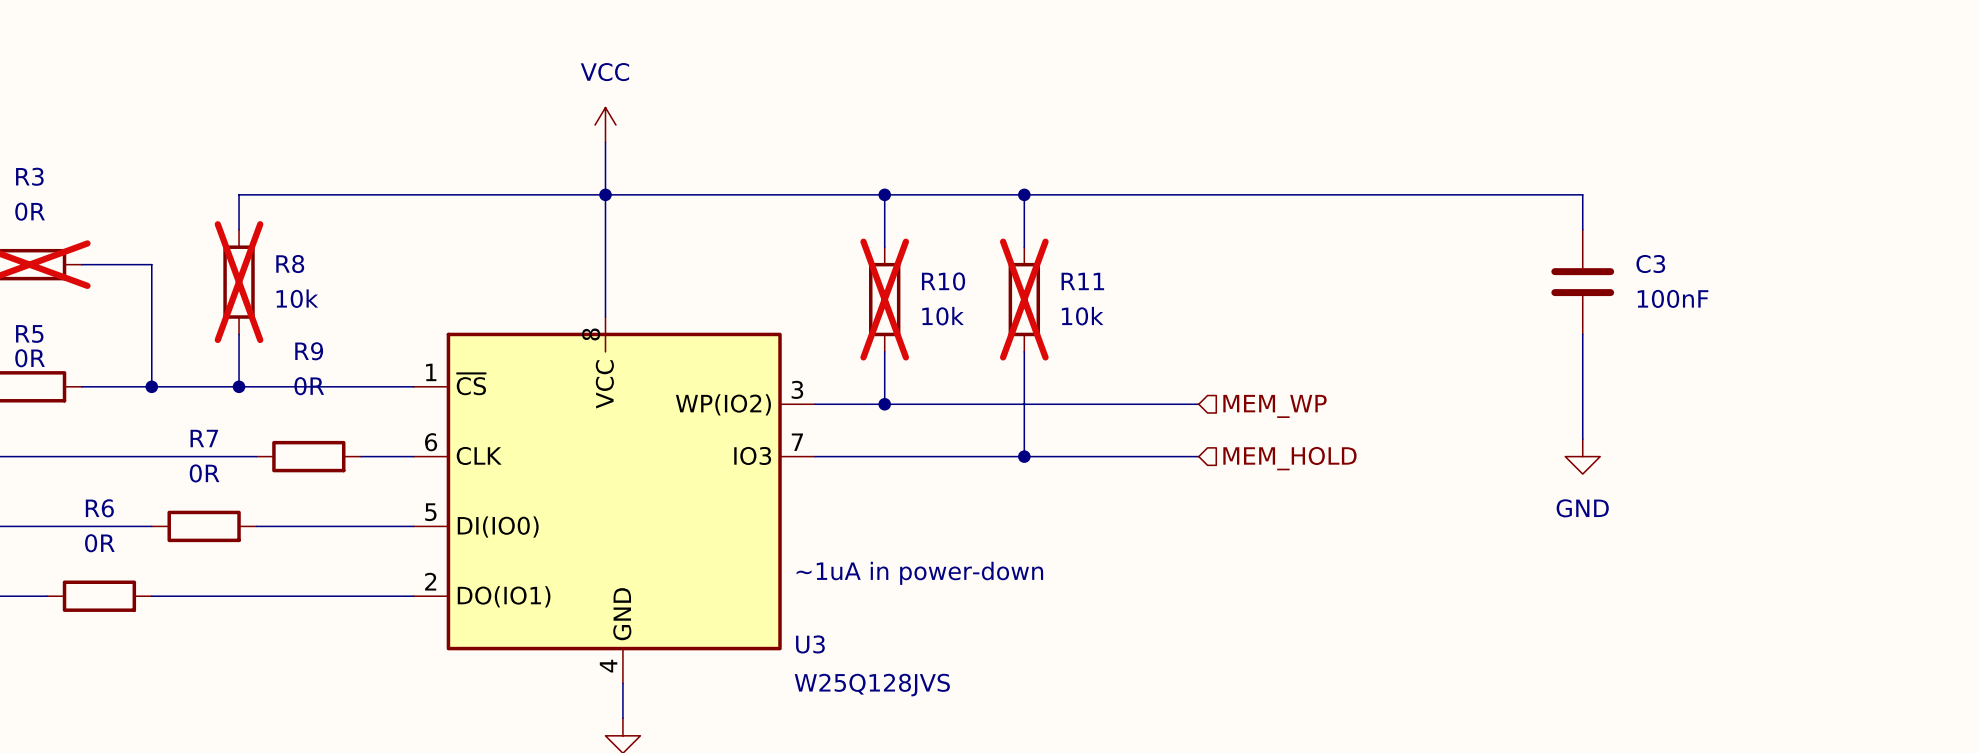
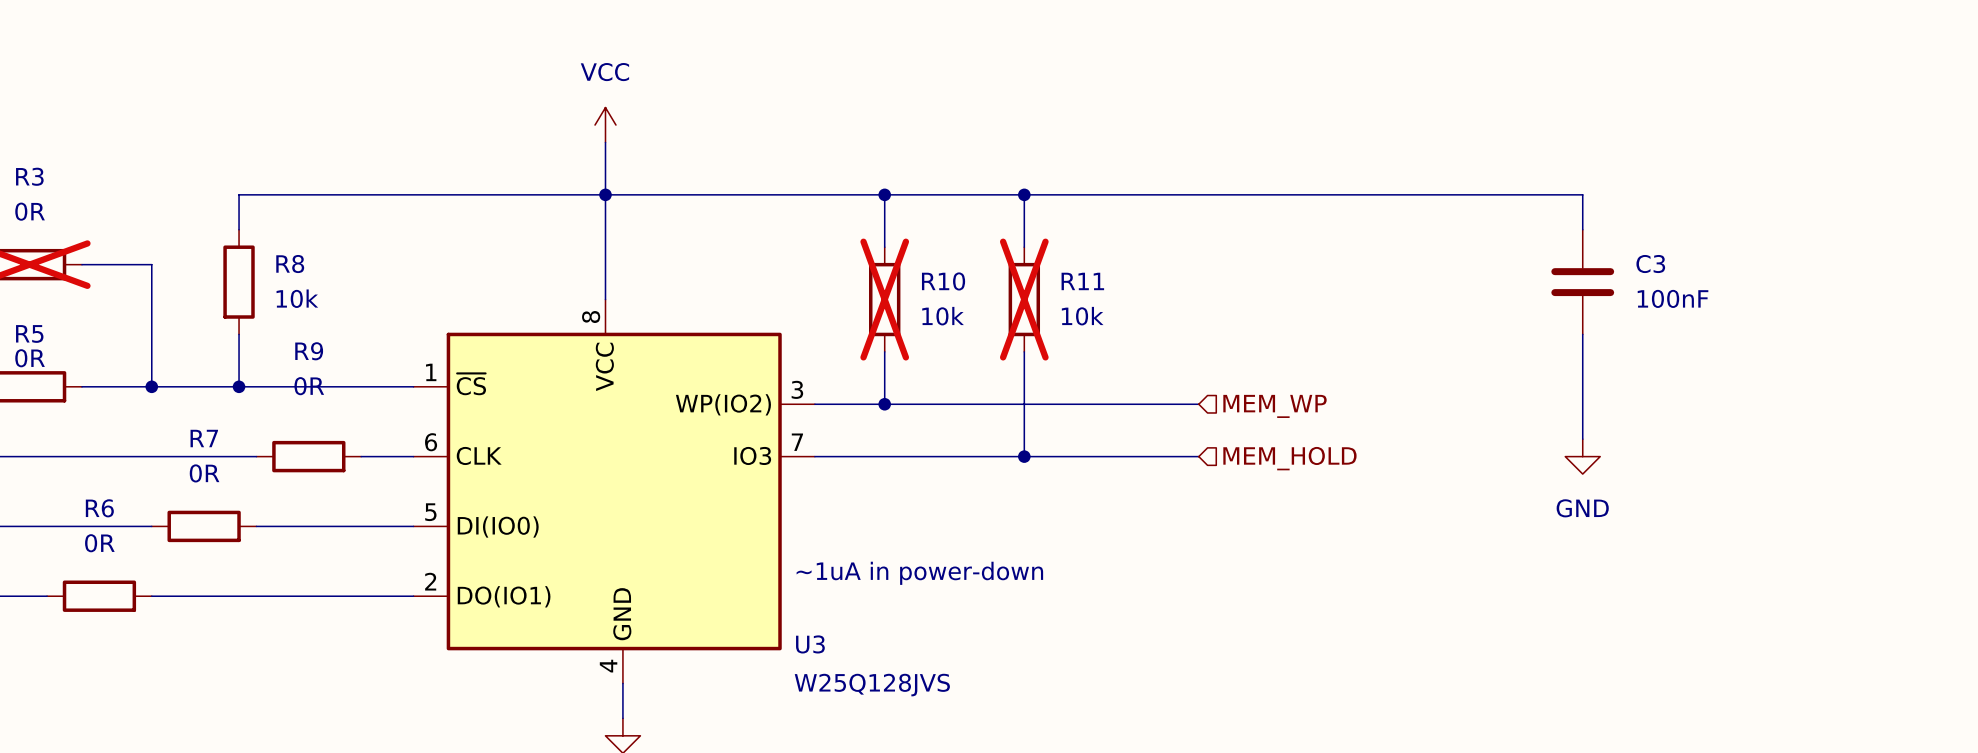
R8 do-not-place cross: (239, 282) -> none
U3 symbol: [413, 317, 815, 684] -> [413, 299, 815, 684]

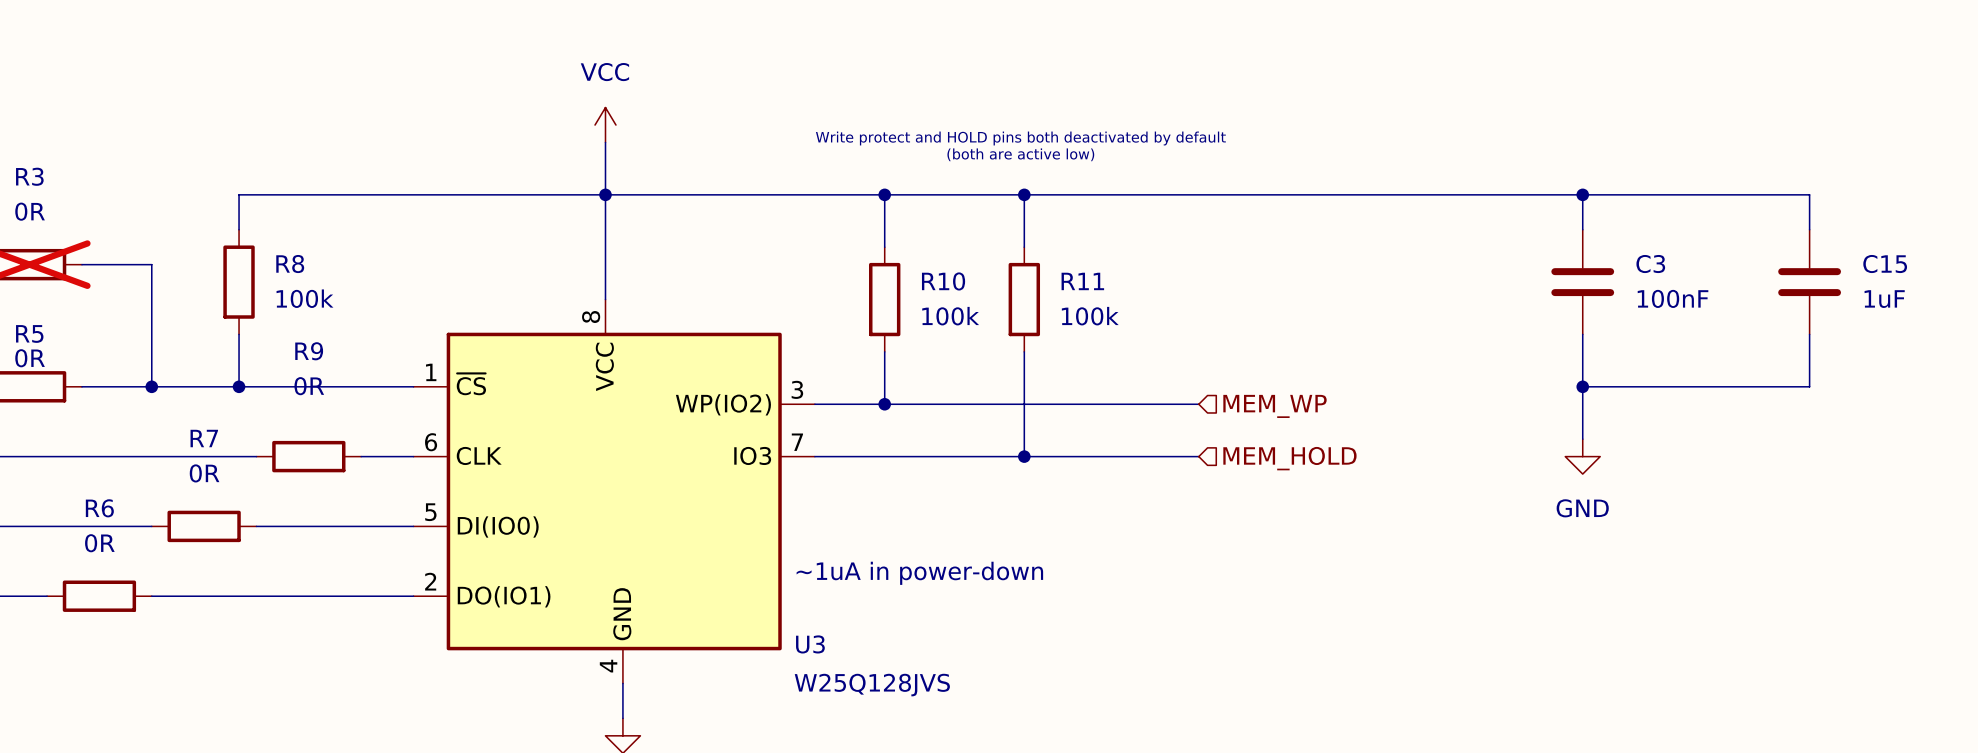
text: none -> Write protect and HOLD pins both deactivated by default (1020, 138)
text: none -> (both are active low) (1020, 154)
wire: none -> (1582, 194) (1809, 194) (1809, 229)
junction: none -> (1582, 194)
C15: none -> 1uF (1809, 282)
R8 value: 10k (297, 298) -> 100k (304, 298)
R10 do-not-place cross: (884, 299) -> none
R11 do-not-place cross: (1024, 299) -> none
R10 value: 10k (943, 316) -> 100k (950, 316)
R11 value: 10k (1082, 316) -> 100k (1090, 316)
wire: none -> (1809, 334) (1809, 386) (1582, 386)
junction: none -> (1582, 386)

